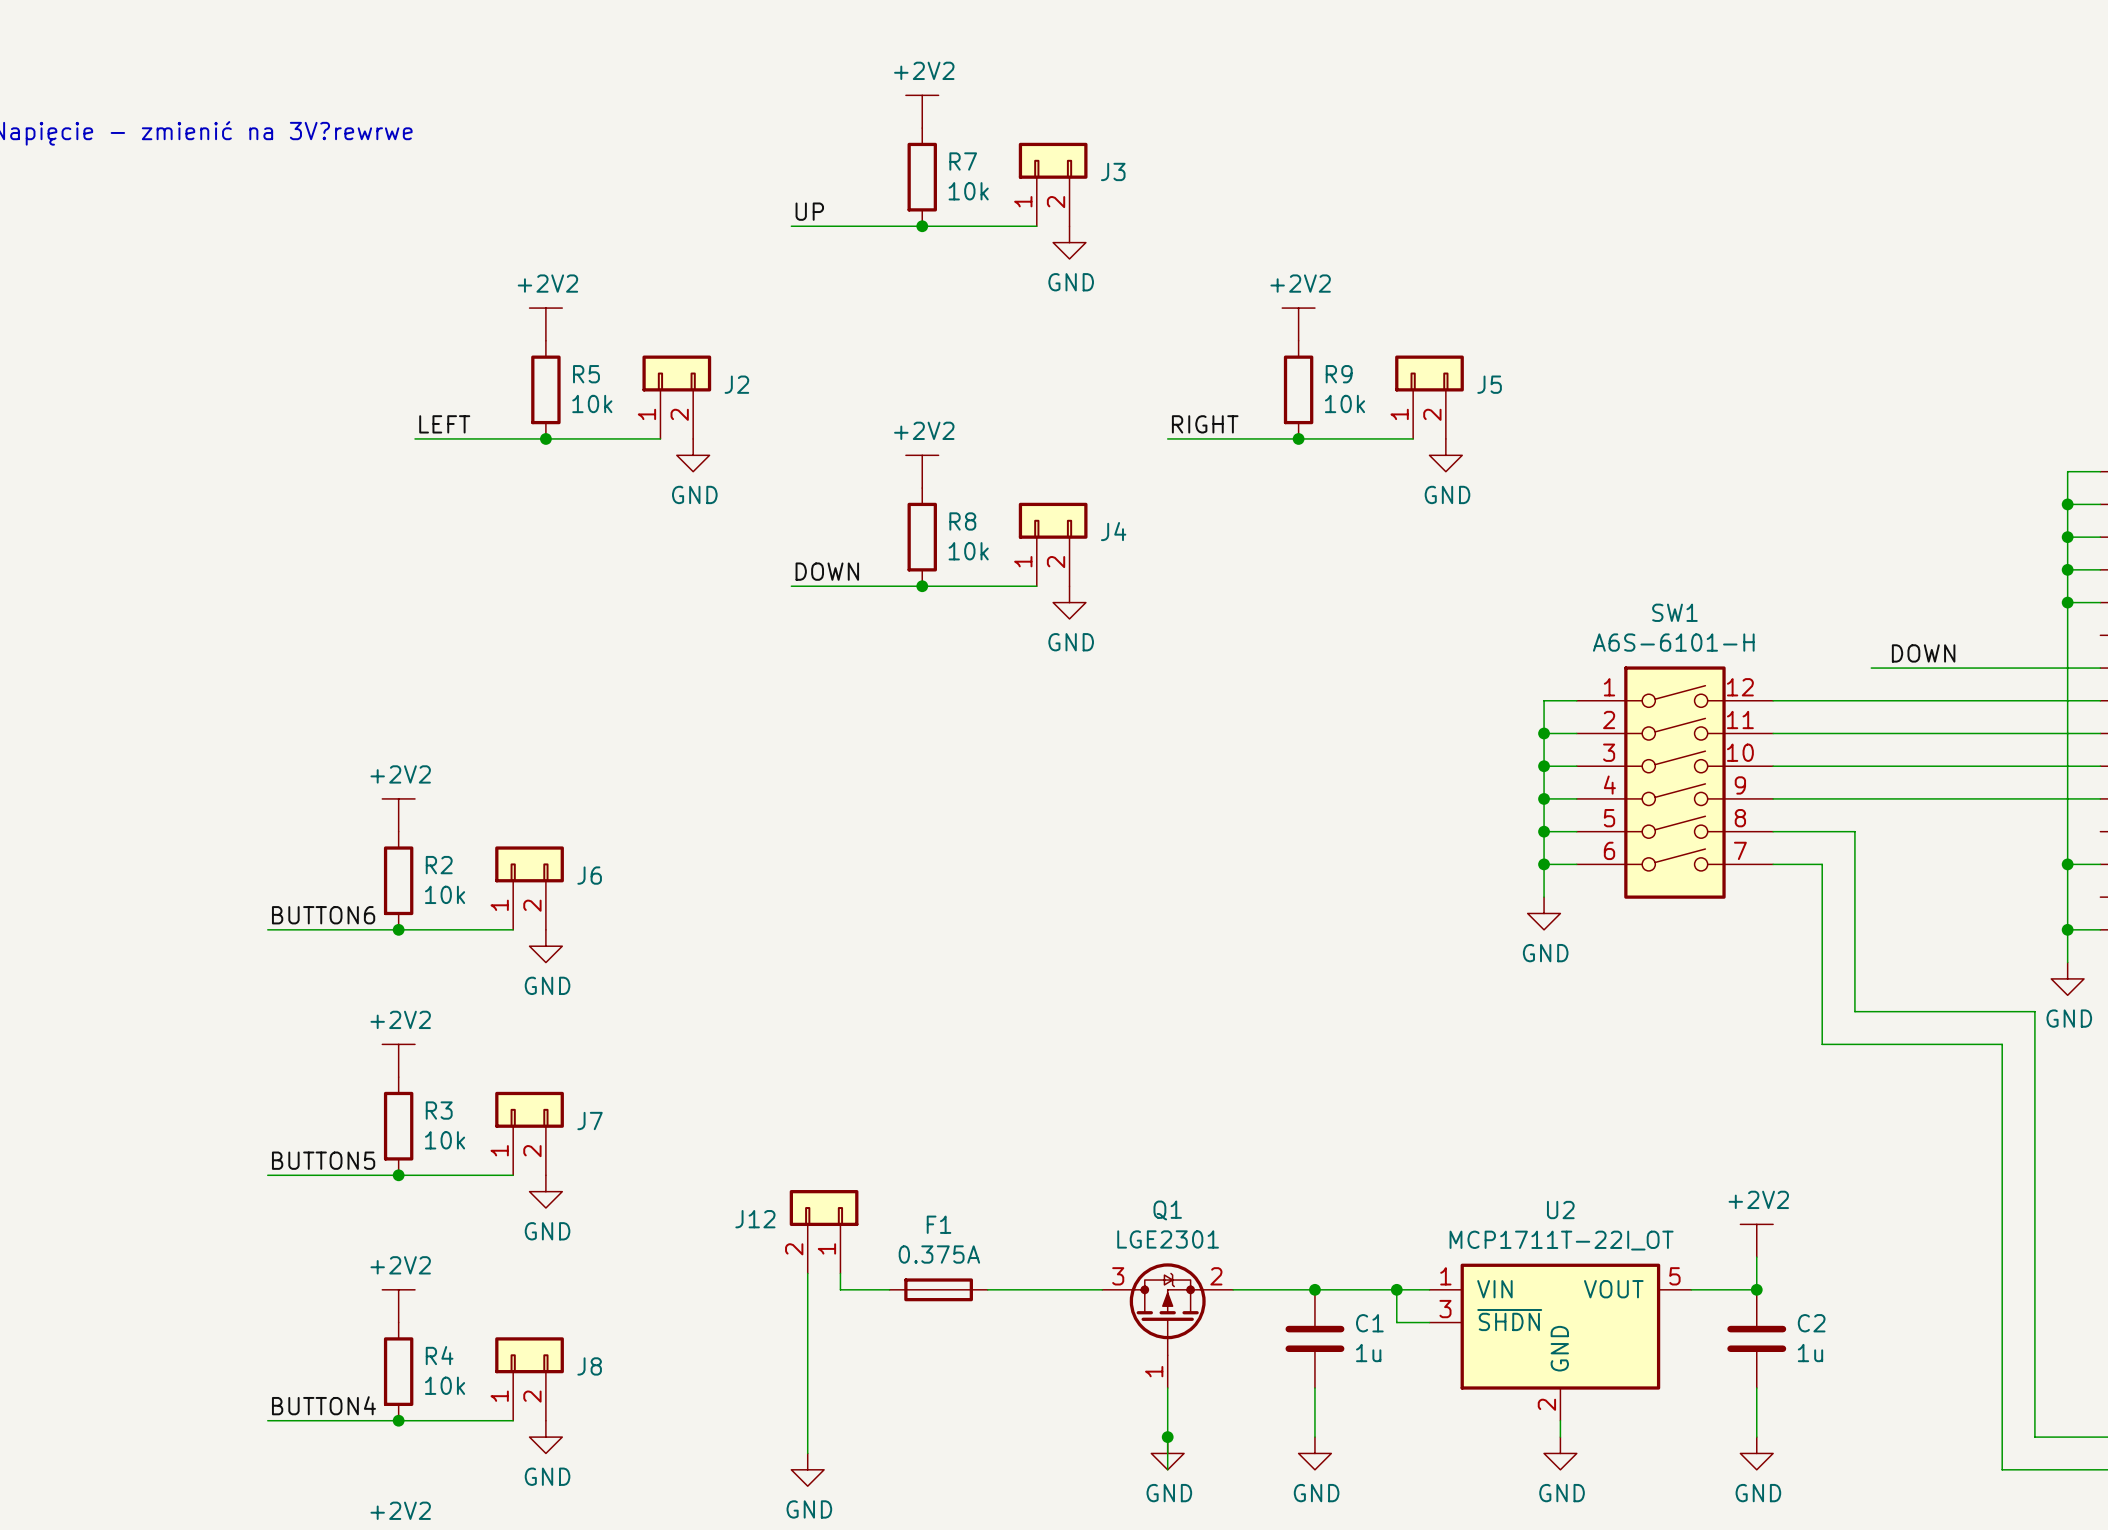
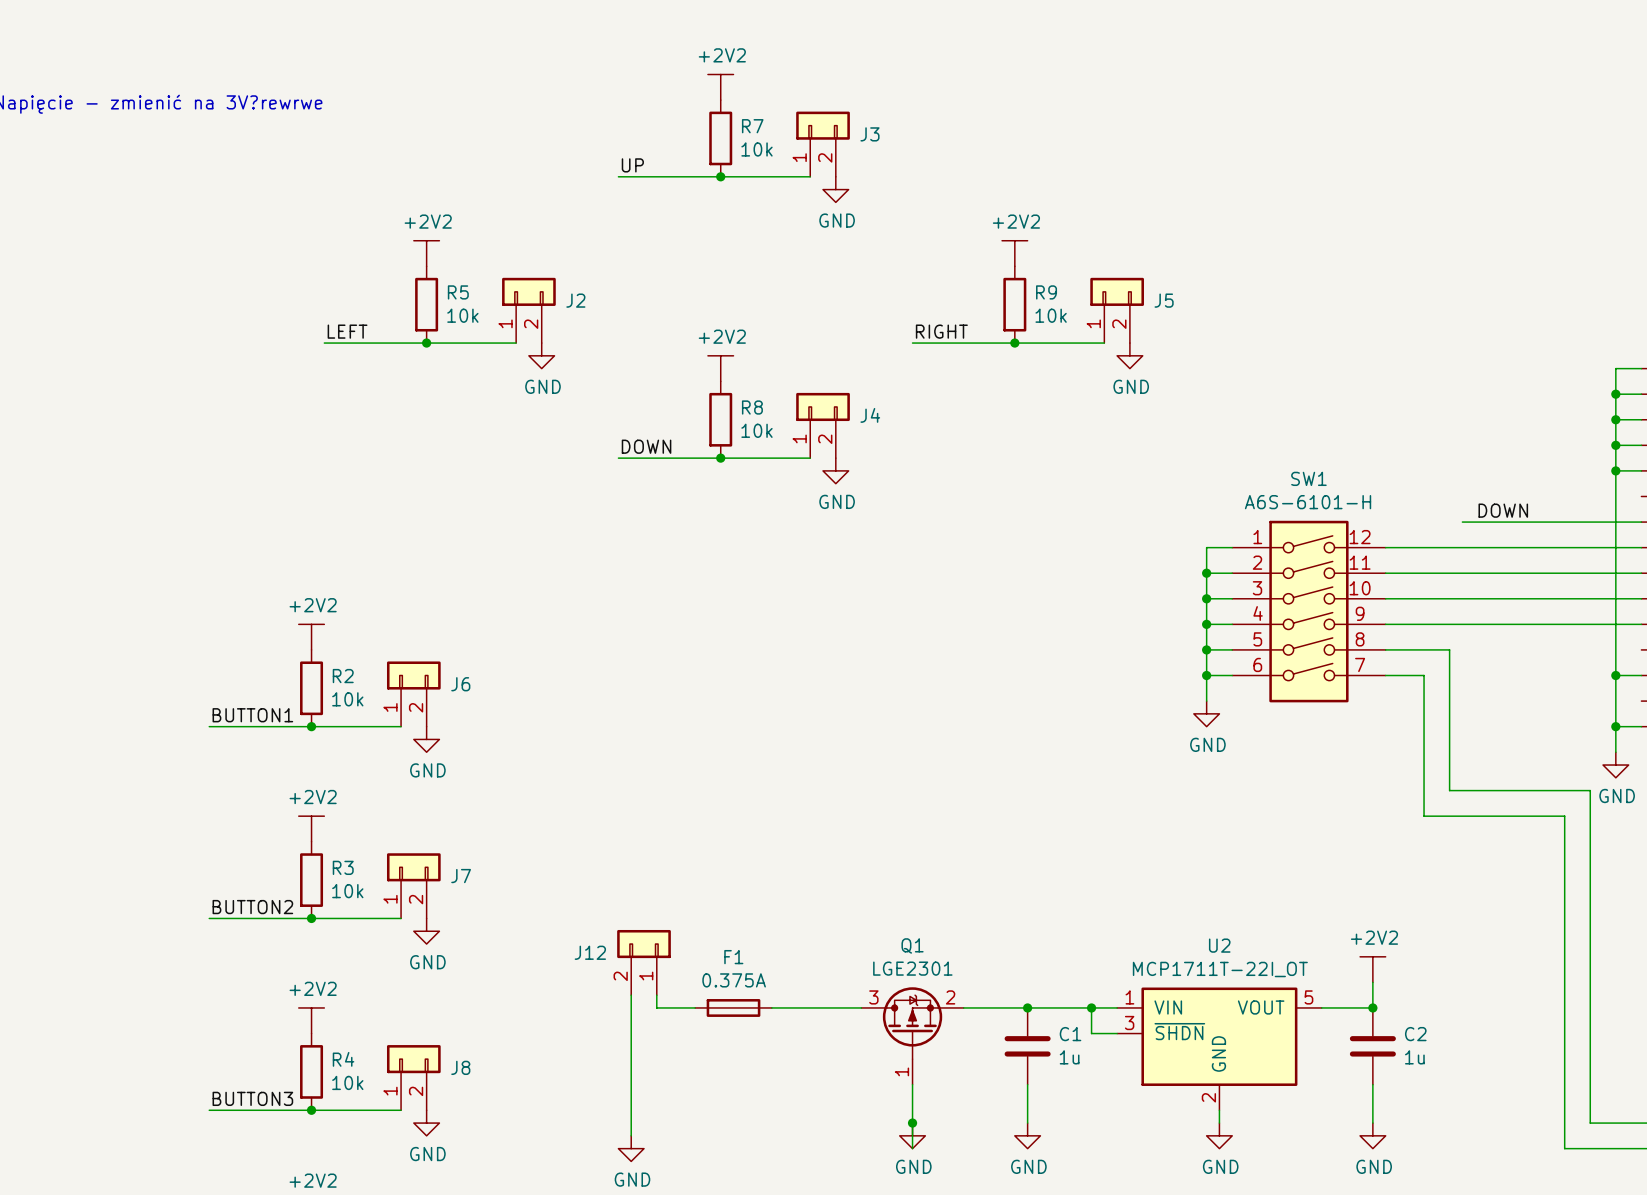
label: BUTTON6 (323, 915) -> BUTTON1 (252, 715)
label: BUTTON5 (323, 1160) -> BUTTON2 (252, 907)
label: BUTTON4 (323, 1405) -> BUTTON3 (252, 1098)

